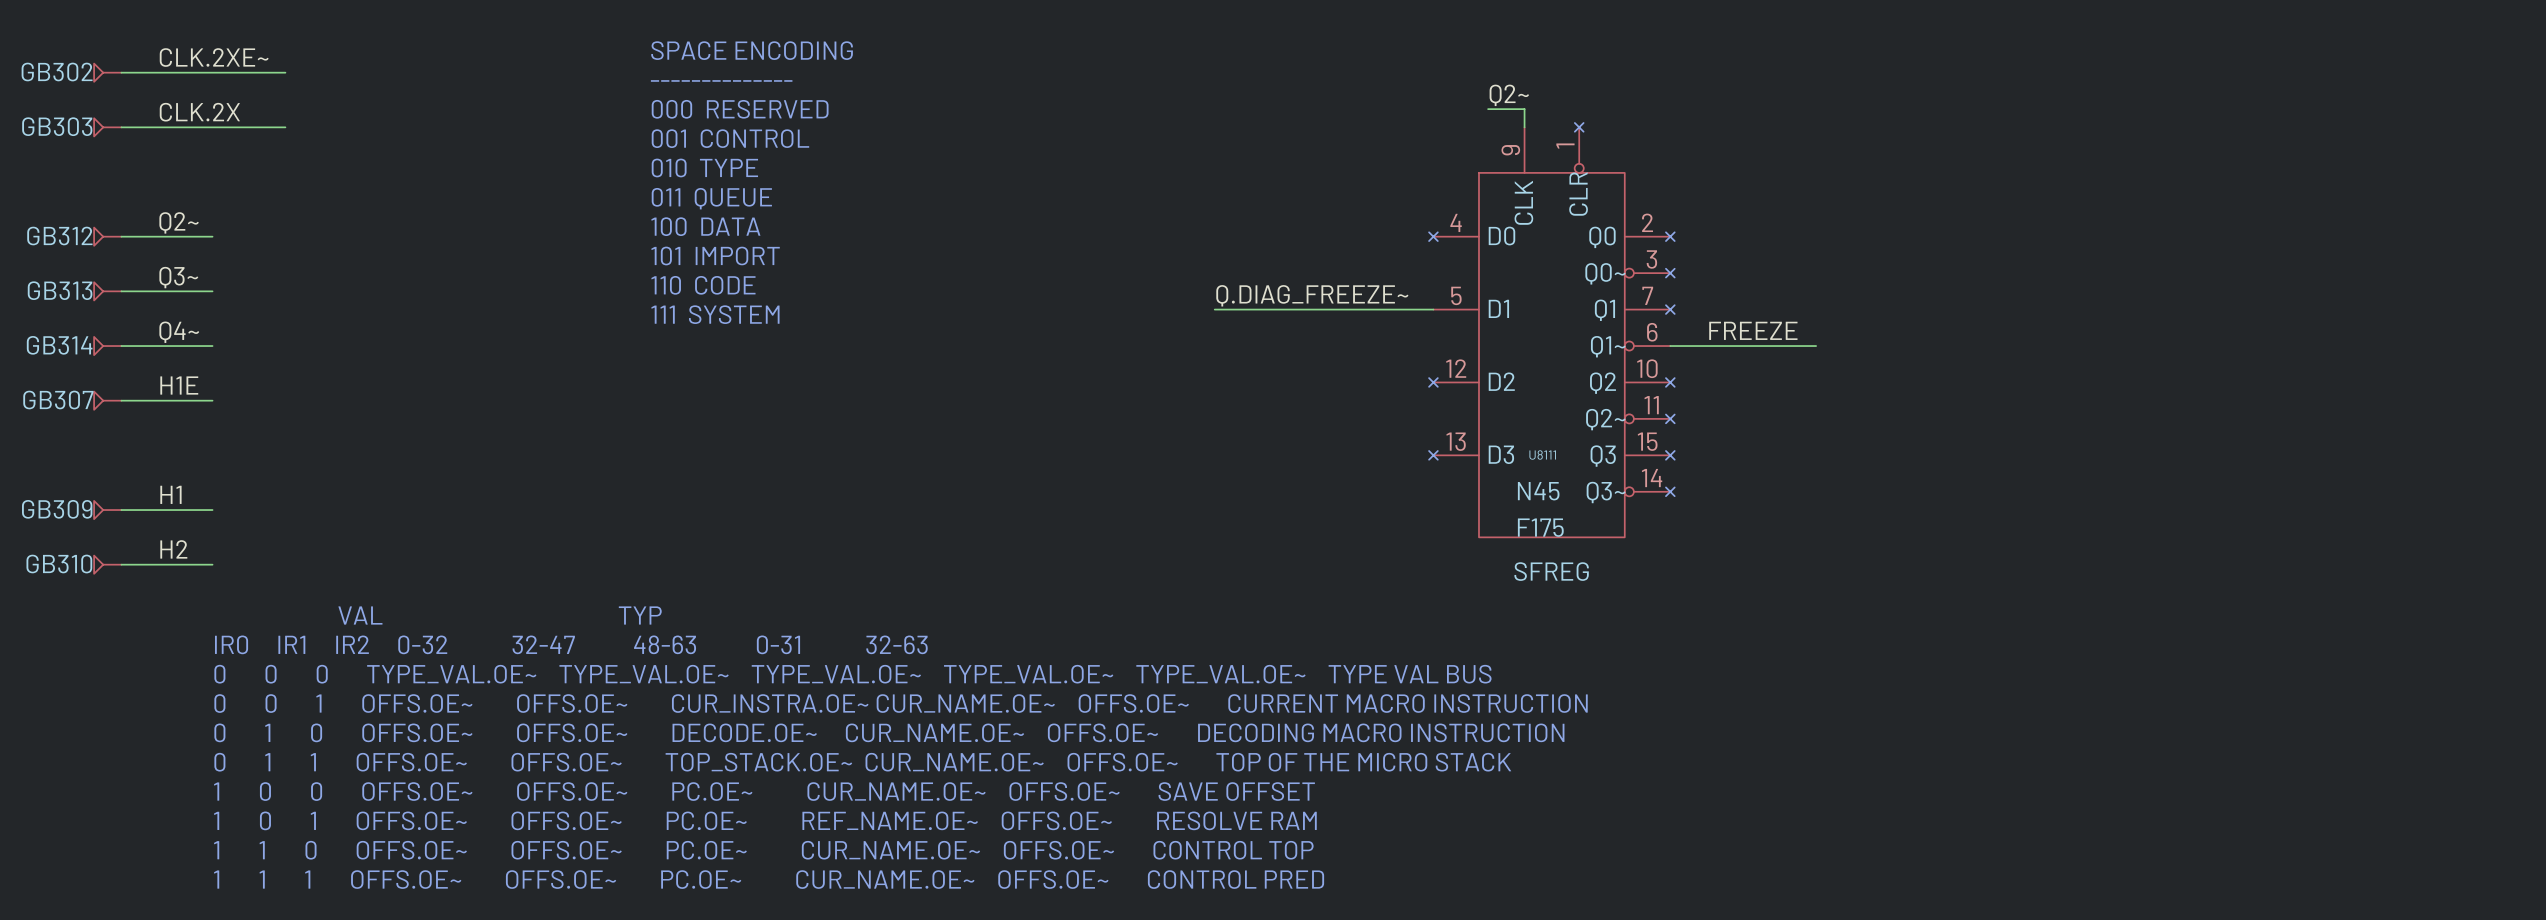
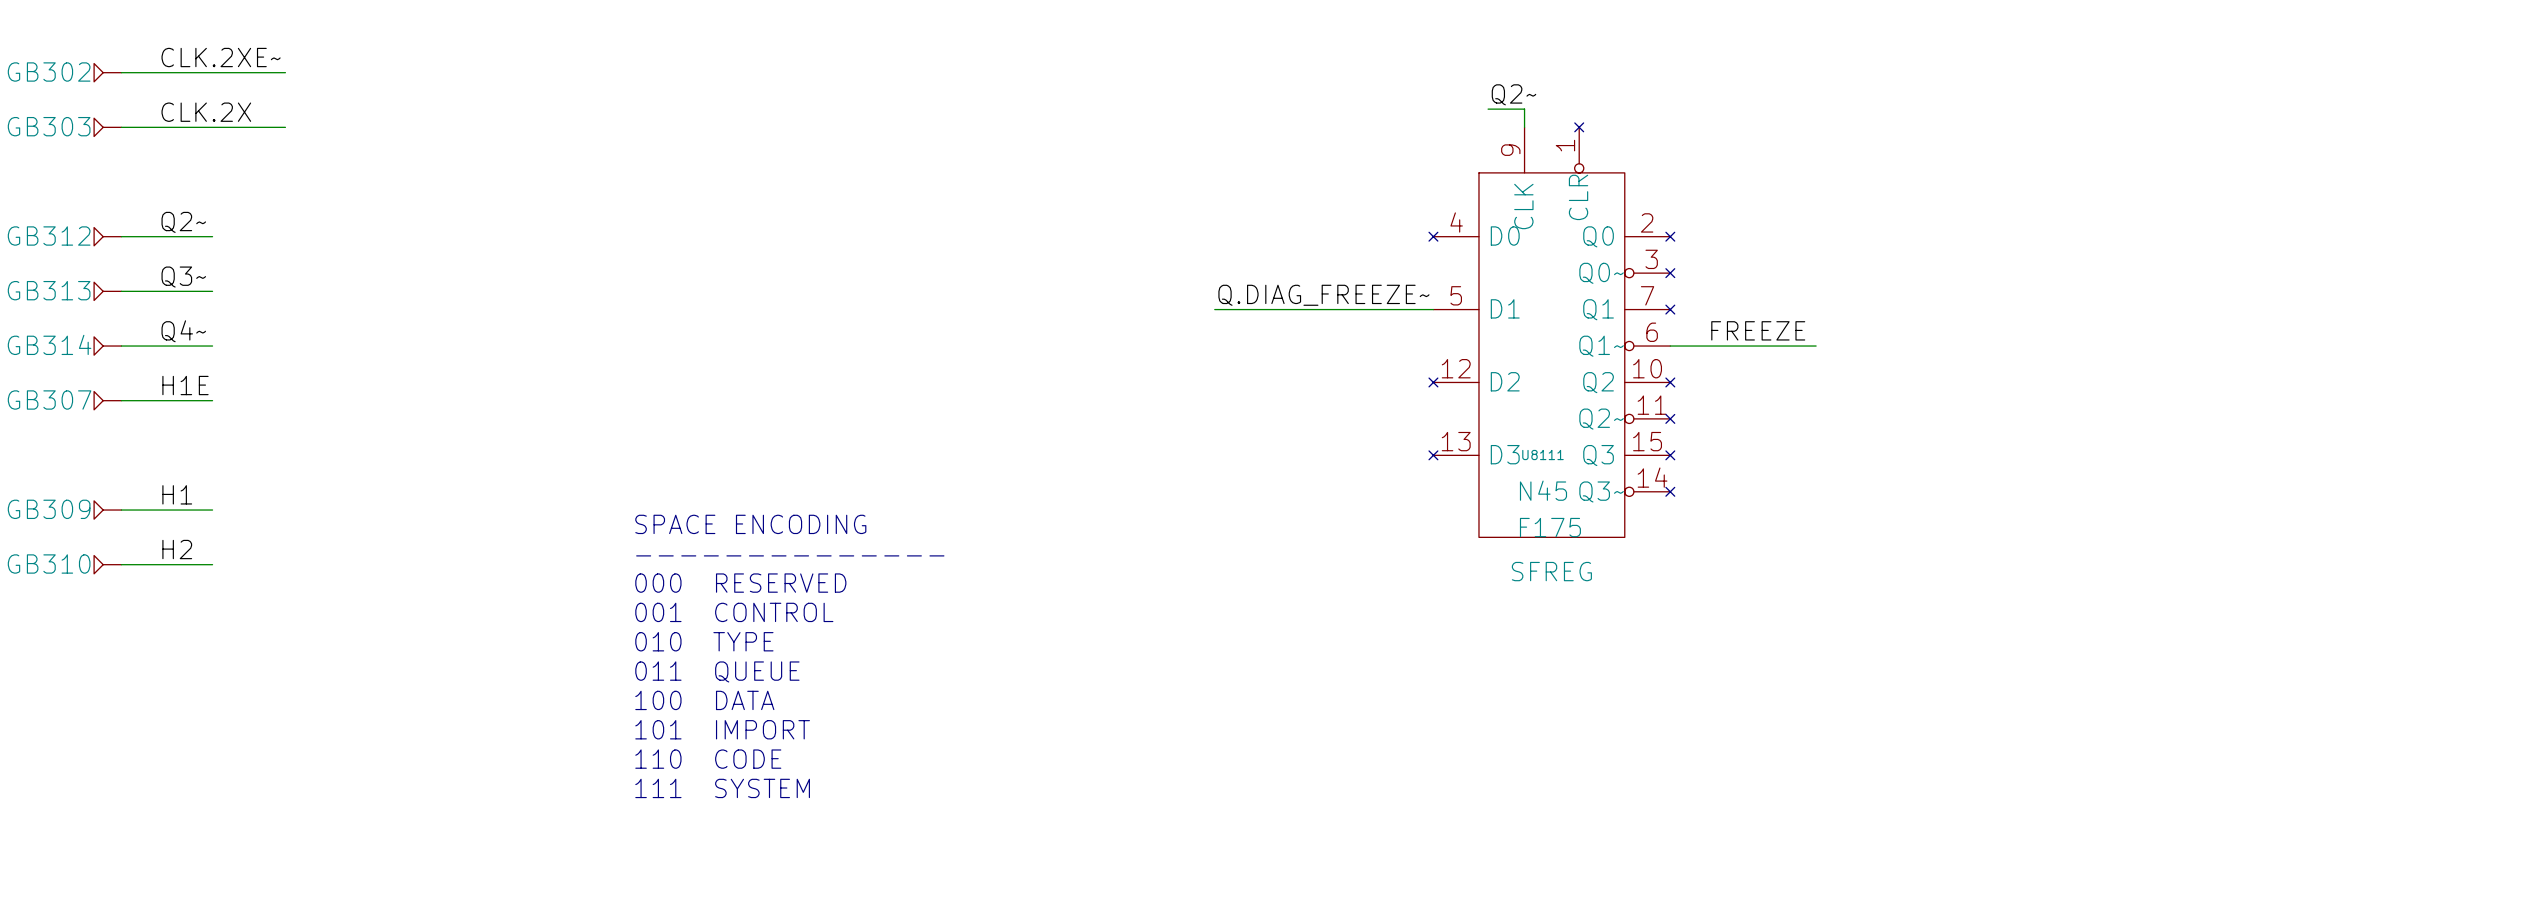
text: SPACE ENCODING (752, 50) -> none
text: -------------- (721, 80) -> none
text: 000 RESERVED (740, 109) -> none
text: 001 CONTROL (730, 138) -> none
text: 010 TYPE (704, 167) -> none
text: 011 QUEUE (711, 198) -> none
text: 100 DATA (705, 226) -> none
text: 101 IMPORT (715, 255) -> none
text: 110 CODE (703, 285) -> none
text: 111 SYSTEM (715, 314) -> none
text: none -> SPACE ENCODING (750, 524)
text: none -> -------------- (790, 555)
text: none -> 000 RESERVED (740, 583)
text: none -> 001 CONTROL (734, 612)
text: VAL TYP (500, 615) -> none
text: none -> 010 TYPE (704, 641)
text: IR0 IR1 IR2 0-32 32-47 48-63 0-31 32-63 (571, 644) -> none
text: none -> 011 QUEUE (717, 671)
text: 0 0 0 TYPE_VAL.OE~ TYPE_VAL.OE~ TYPE_VAL.OE~ TYPE_VAL.OE~ TYPE_VAL.OE~ TYPE VAL BUS (852, 674) -> none
text: none -> 100 DATA (704, 700)
text: 0 0 1 OFFS.OE~ OFFS.OE~ CUR_INSTRA.OE~ CUR_NAME.OE~ OFFS.OE~ CURRENT MACRO INSTRUCTION (901, 703) -> none
text: none -> 101 IMPORT (722, 729)
text: 0 1 0 OFFS.OE~ OFFS.OE~ DECODE.OE~ CUR_NAME.OE~ OFFS.OE~ DECODING MACRO INSTRUCTION (889, 732) -> none
text: none -> 110 CODE (708, 759)
text: 0 1 1 OFFS.OE~ OFFS.OE~ TOP_STACK.OE~ CUR_NAME.OE~ OFFS.OE~ TOP OF THE MICRO STACK (862, 762) -> none
text: none -> 111 SYSTEM (722, 788)
text: 1 0 0 OFFS.OE~ OFFS.OE~ PC.OE~ CUR_NAME.OE~ OFFS.OE~ SAVE OFFSET (764, 791) -> none
text: 1 0 1 OFFS.OE~ OFFS.OE~ PC.OE~ REF_NAME.OE~ OFFS.OE~ RESOLVE RAM (765, 820) -> none
text: 1 1 0 OFFS.OE~ OFFS.OE~ PC.OE~ CUR_NAME.OE~ OFFS.OE~ CONTROL TOP (763, 850) -> none
text: 1 1 1 OFFS.OE~ OFFS.OE~ PC.OE~ CUR_NAME.OE~ OFFS.OE~ CONTROL PRED (769, 879) -> none

